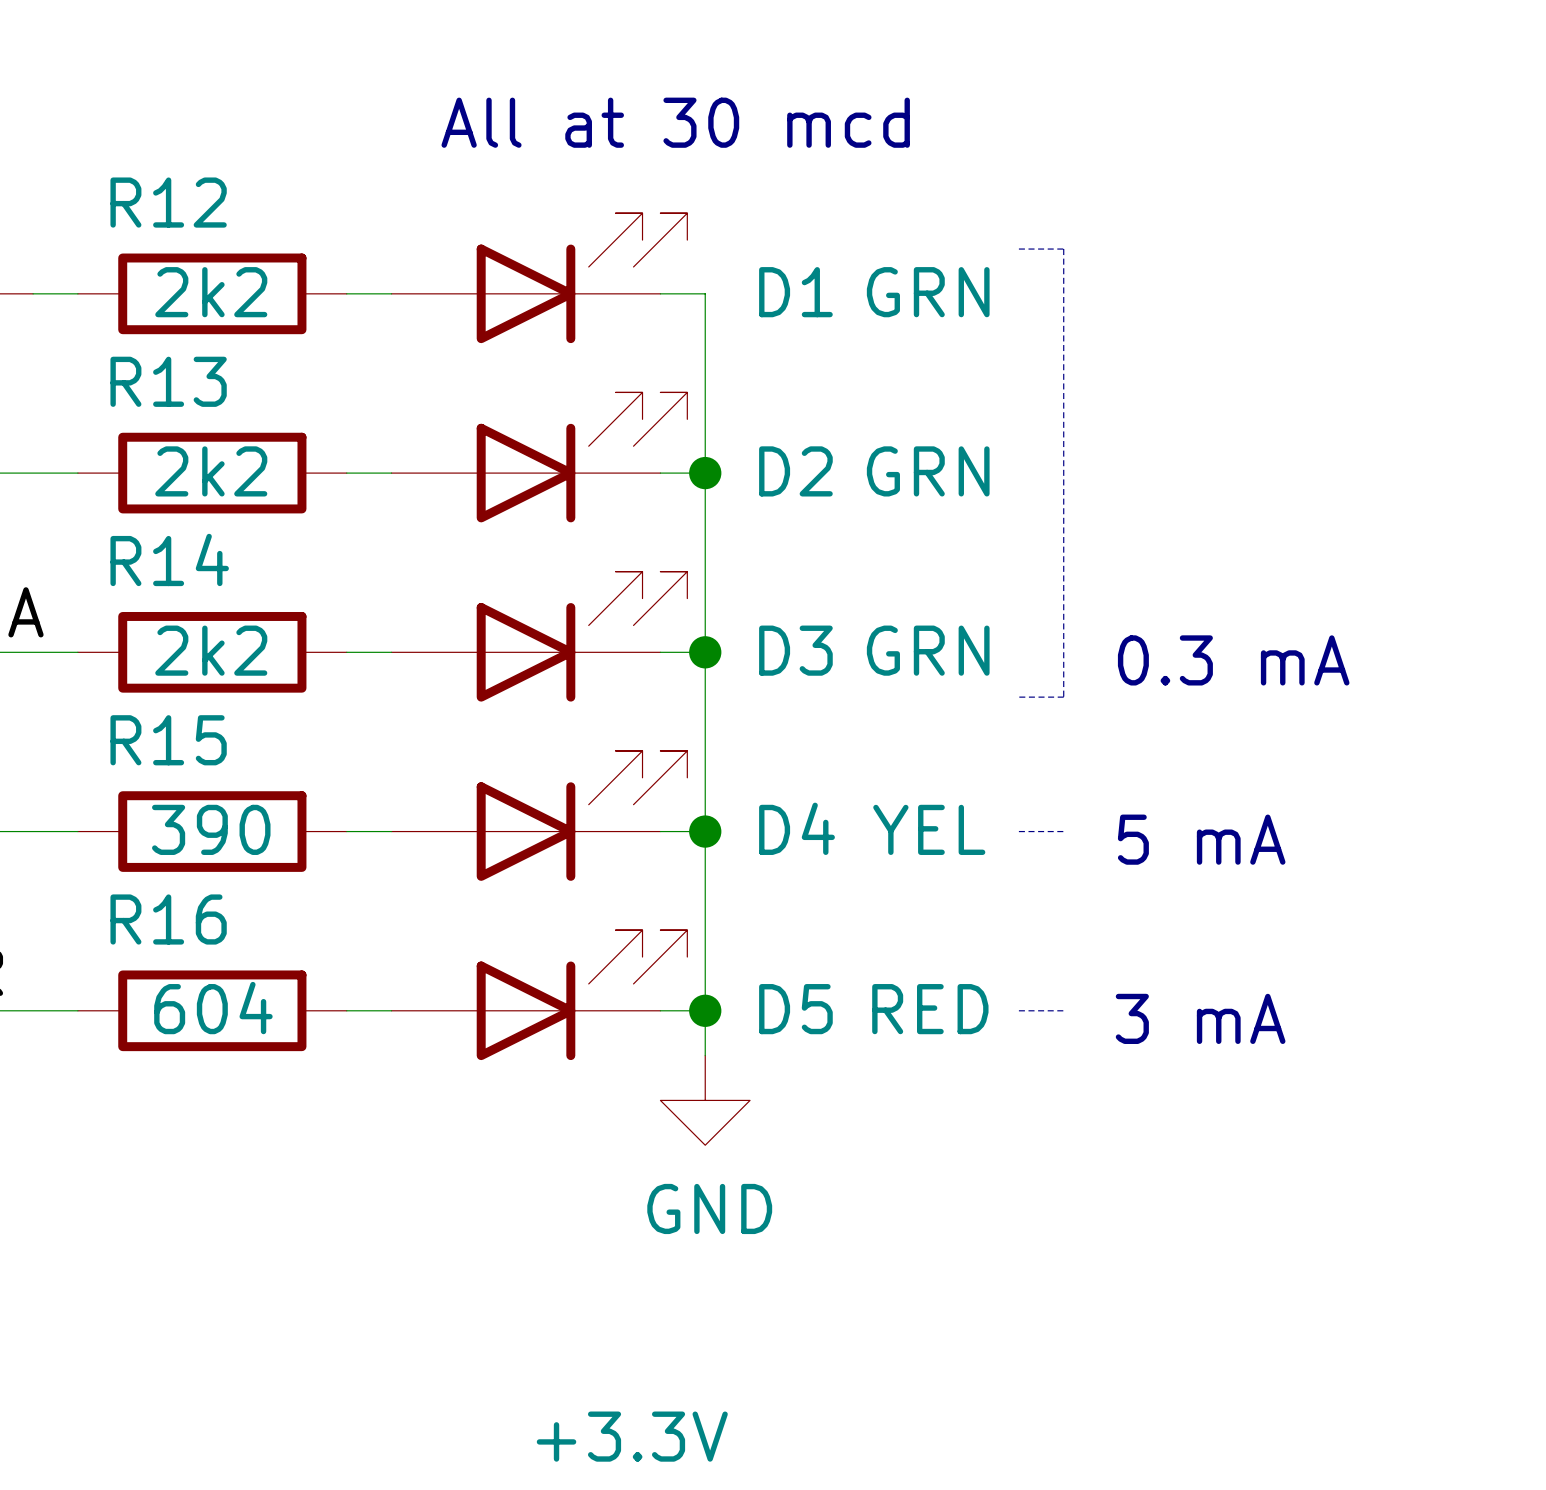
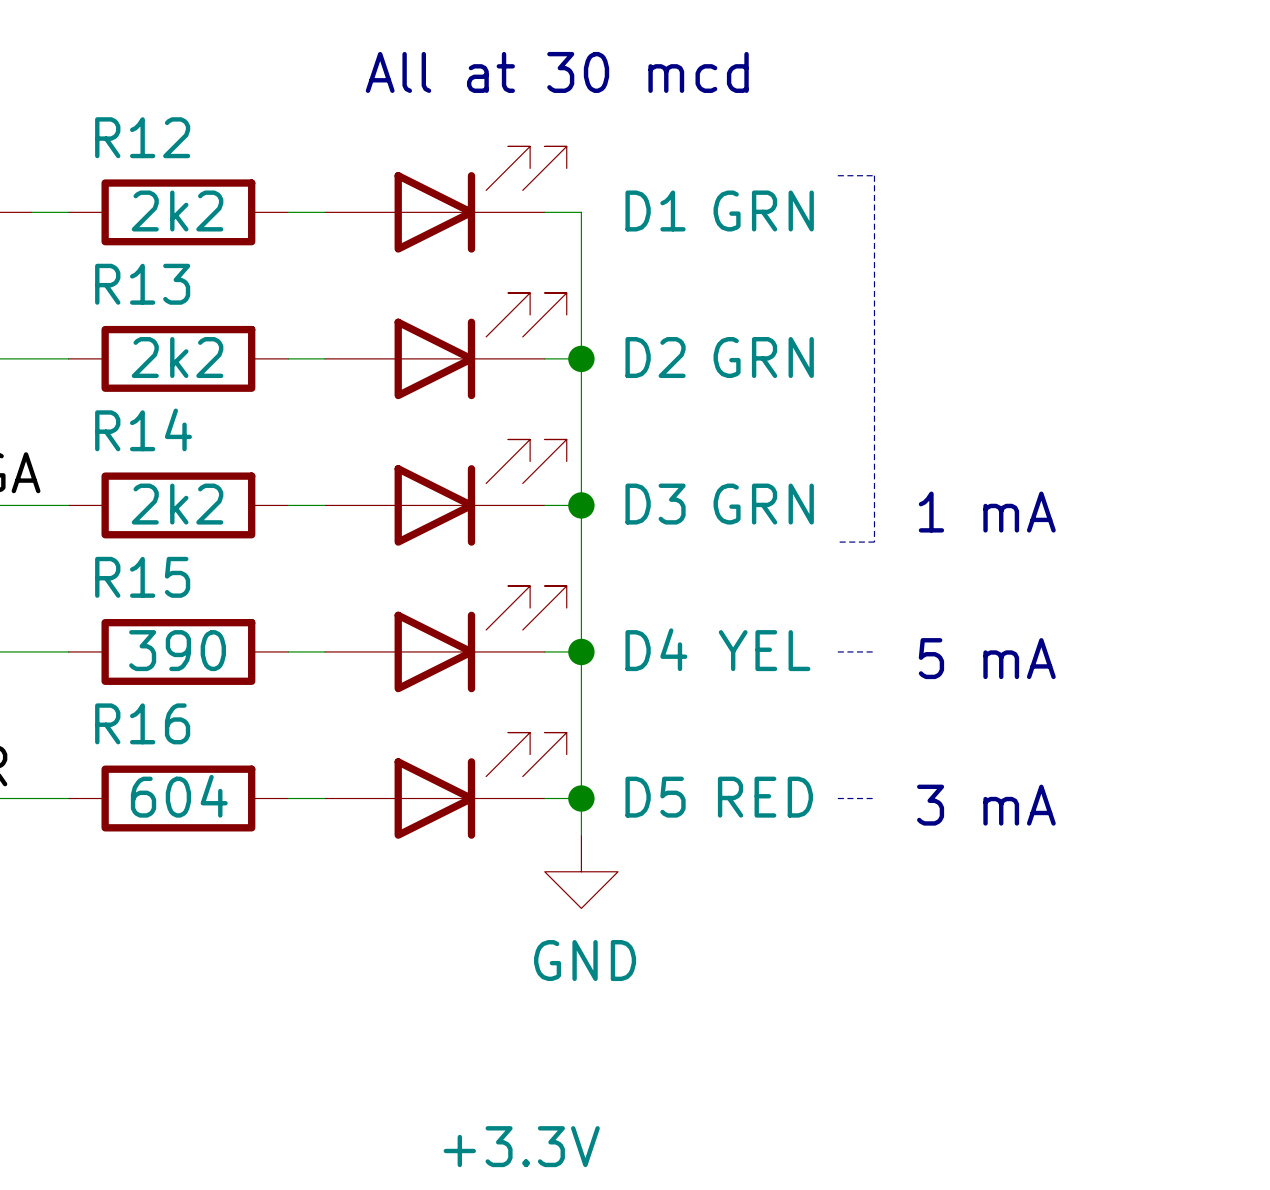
text: 0.3 mA (1233, 660) -> 1 mA (987, 512)

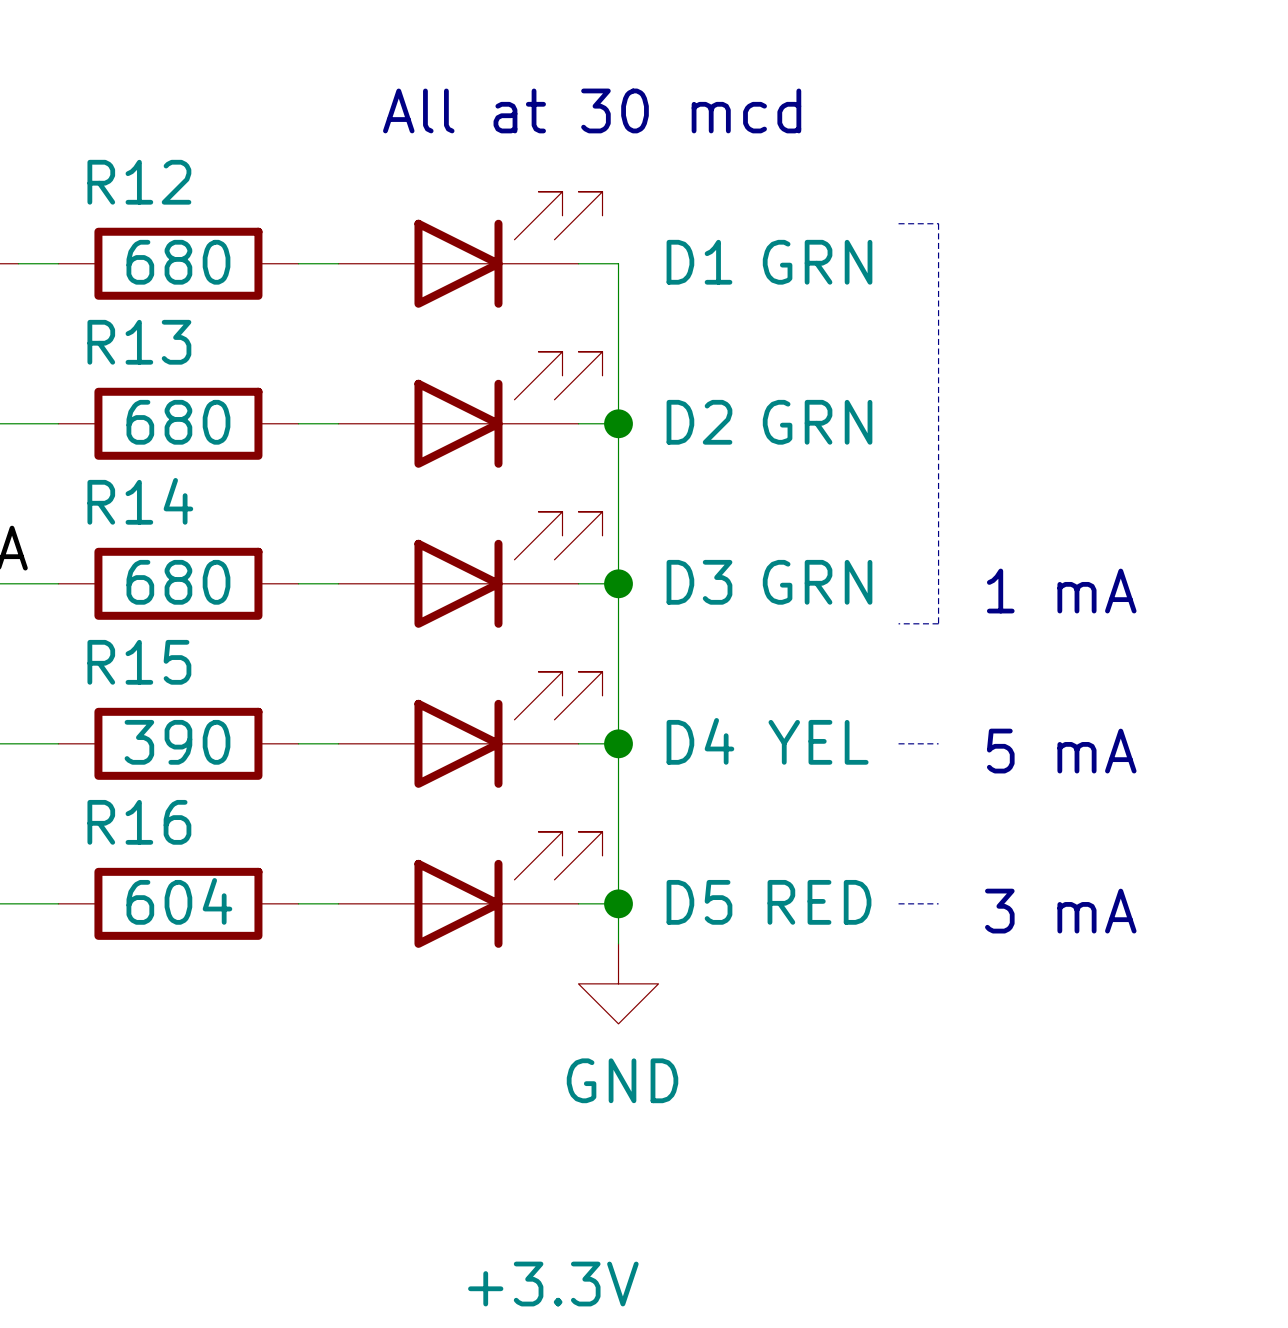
R12 value: 2k2 (177, 210) -> 680 (178, 262)
R13 value: 2k2 (177, 357) -> 680 (178, 422)
R14 value: 2k2 (177, 504) -> 680 (178, 582)

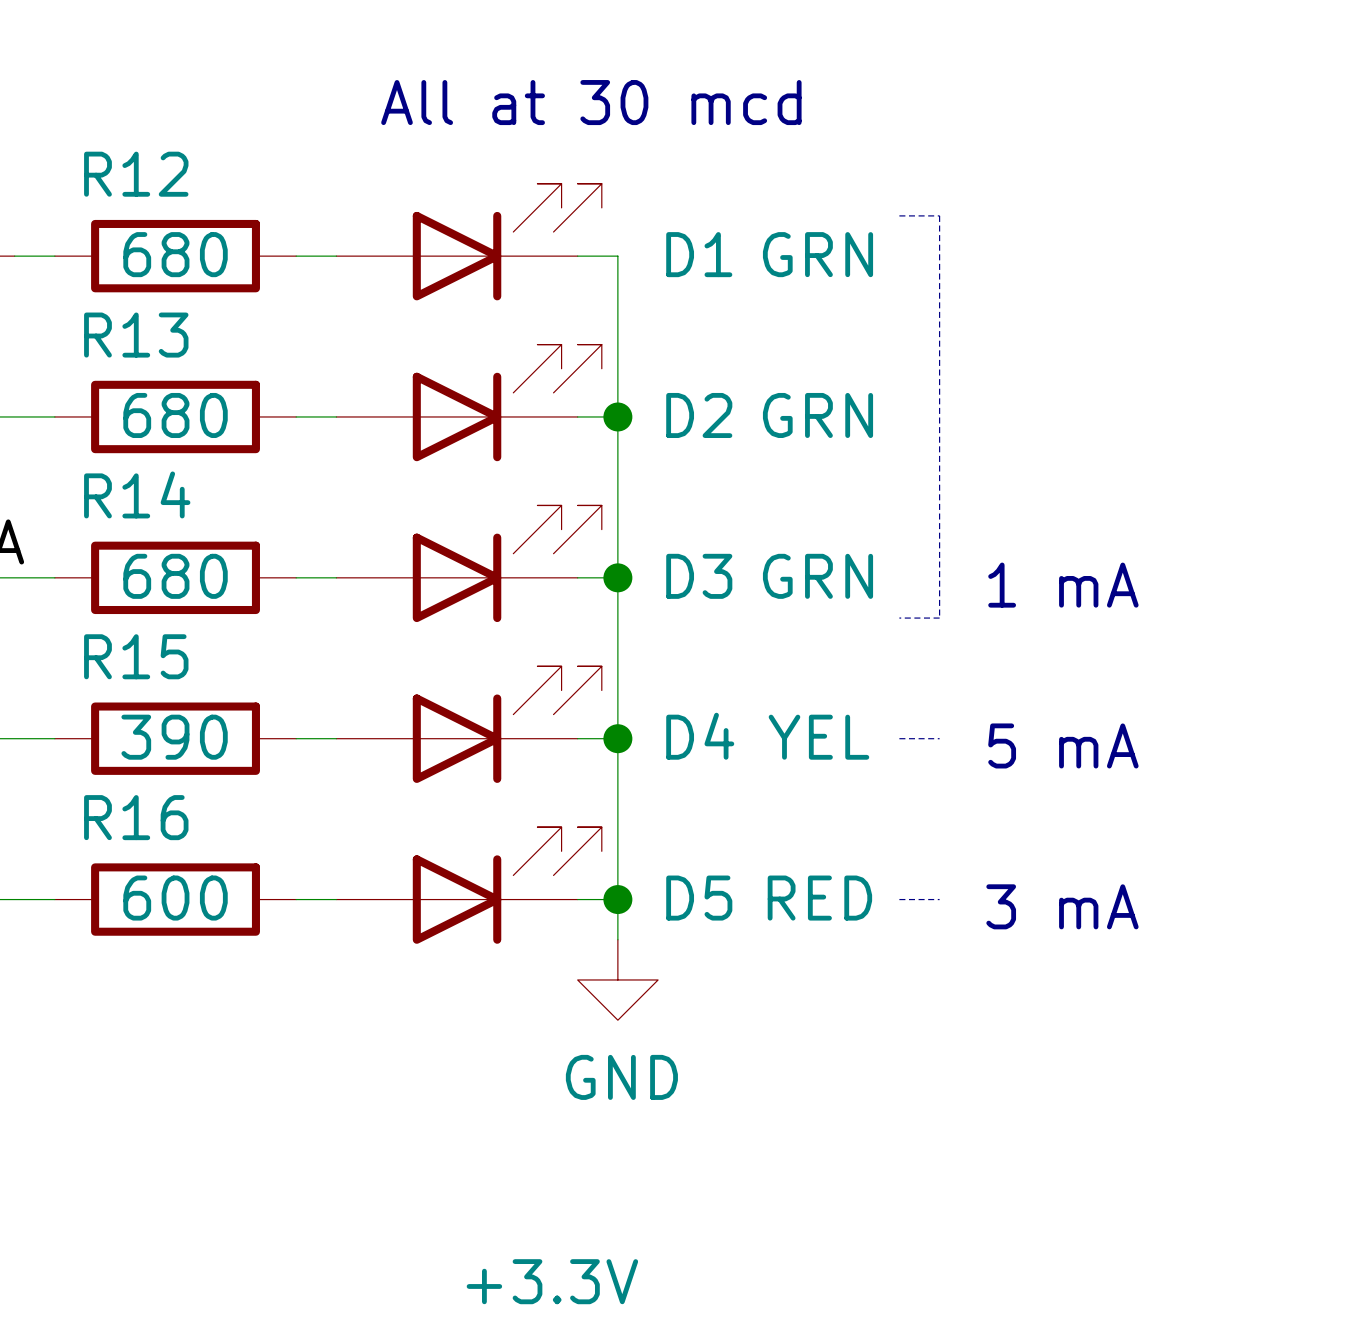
R16 value: 604 (179, 901) -> 600 (175, 898)

